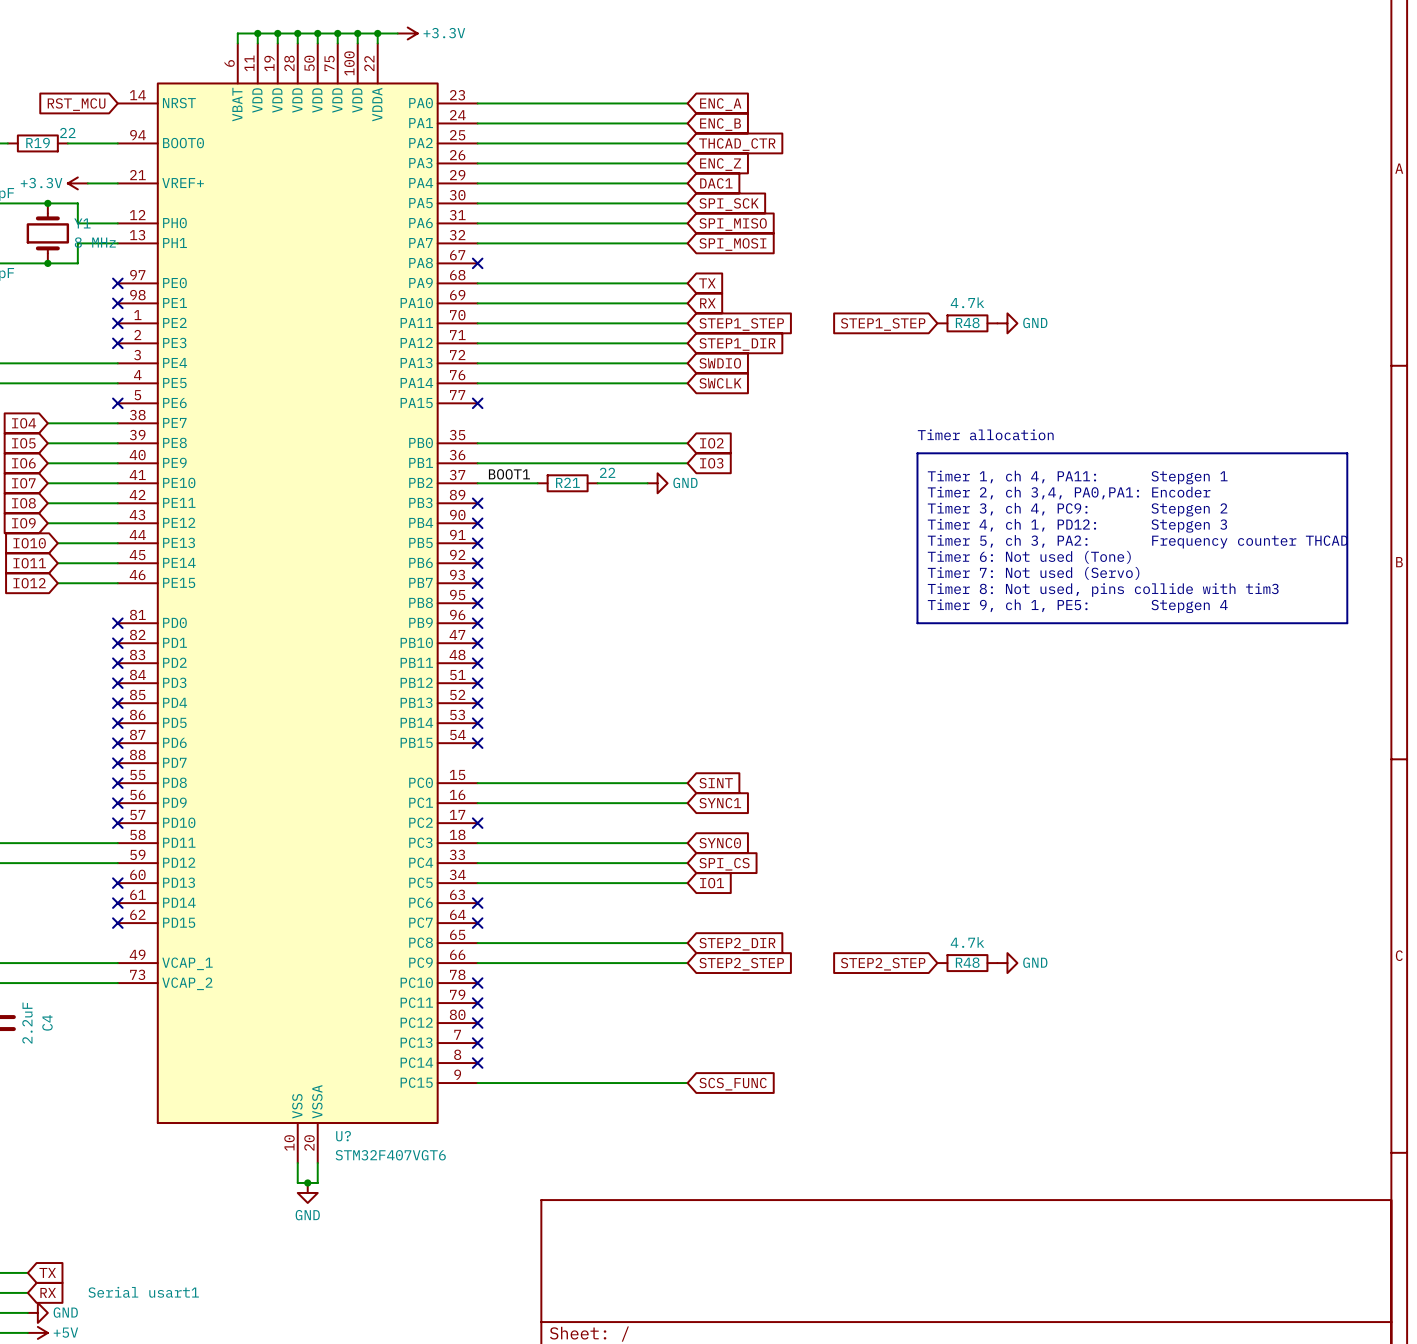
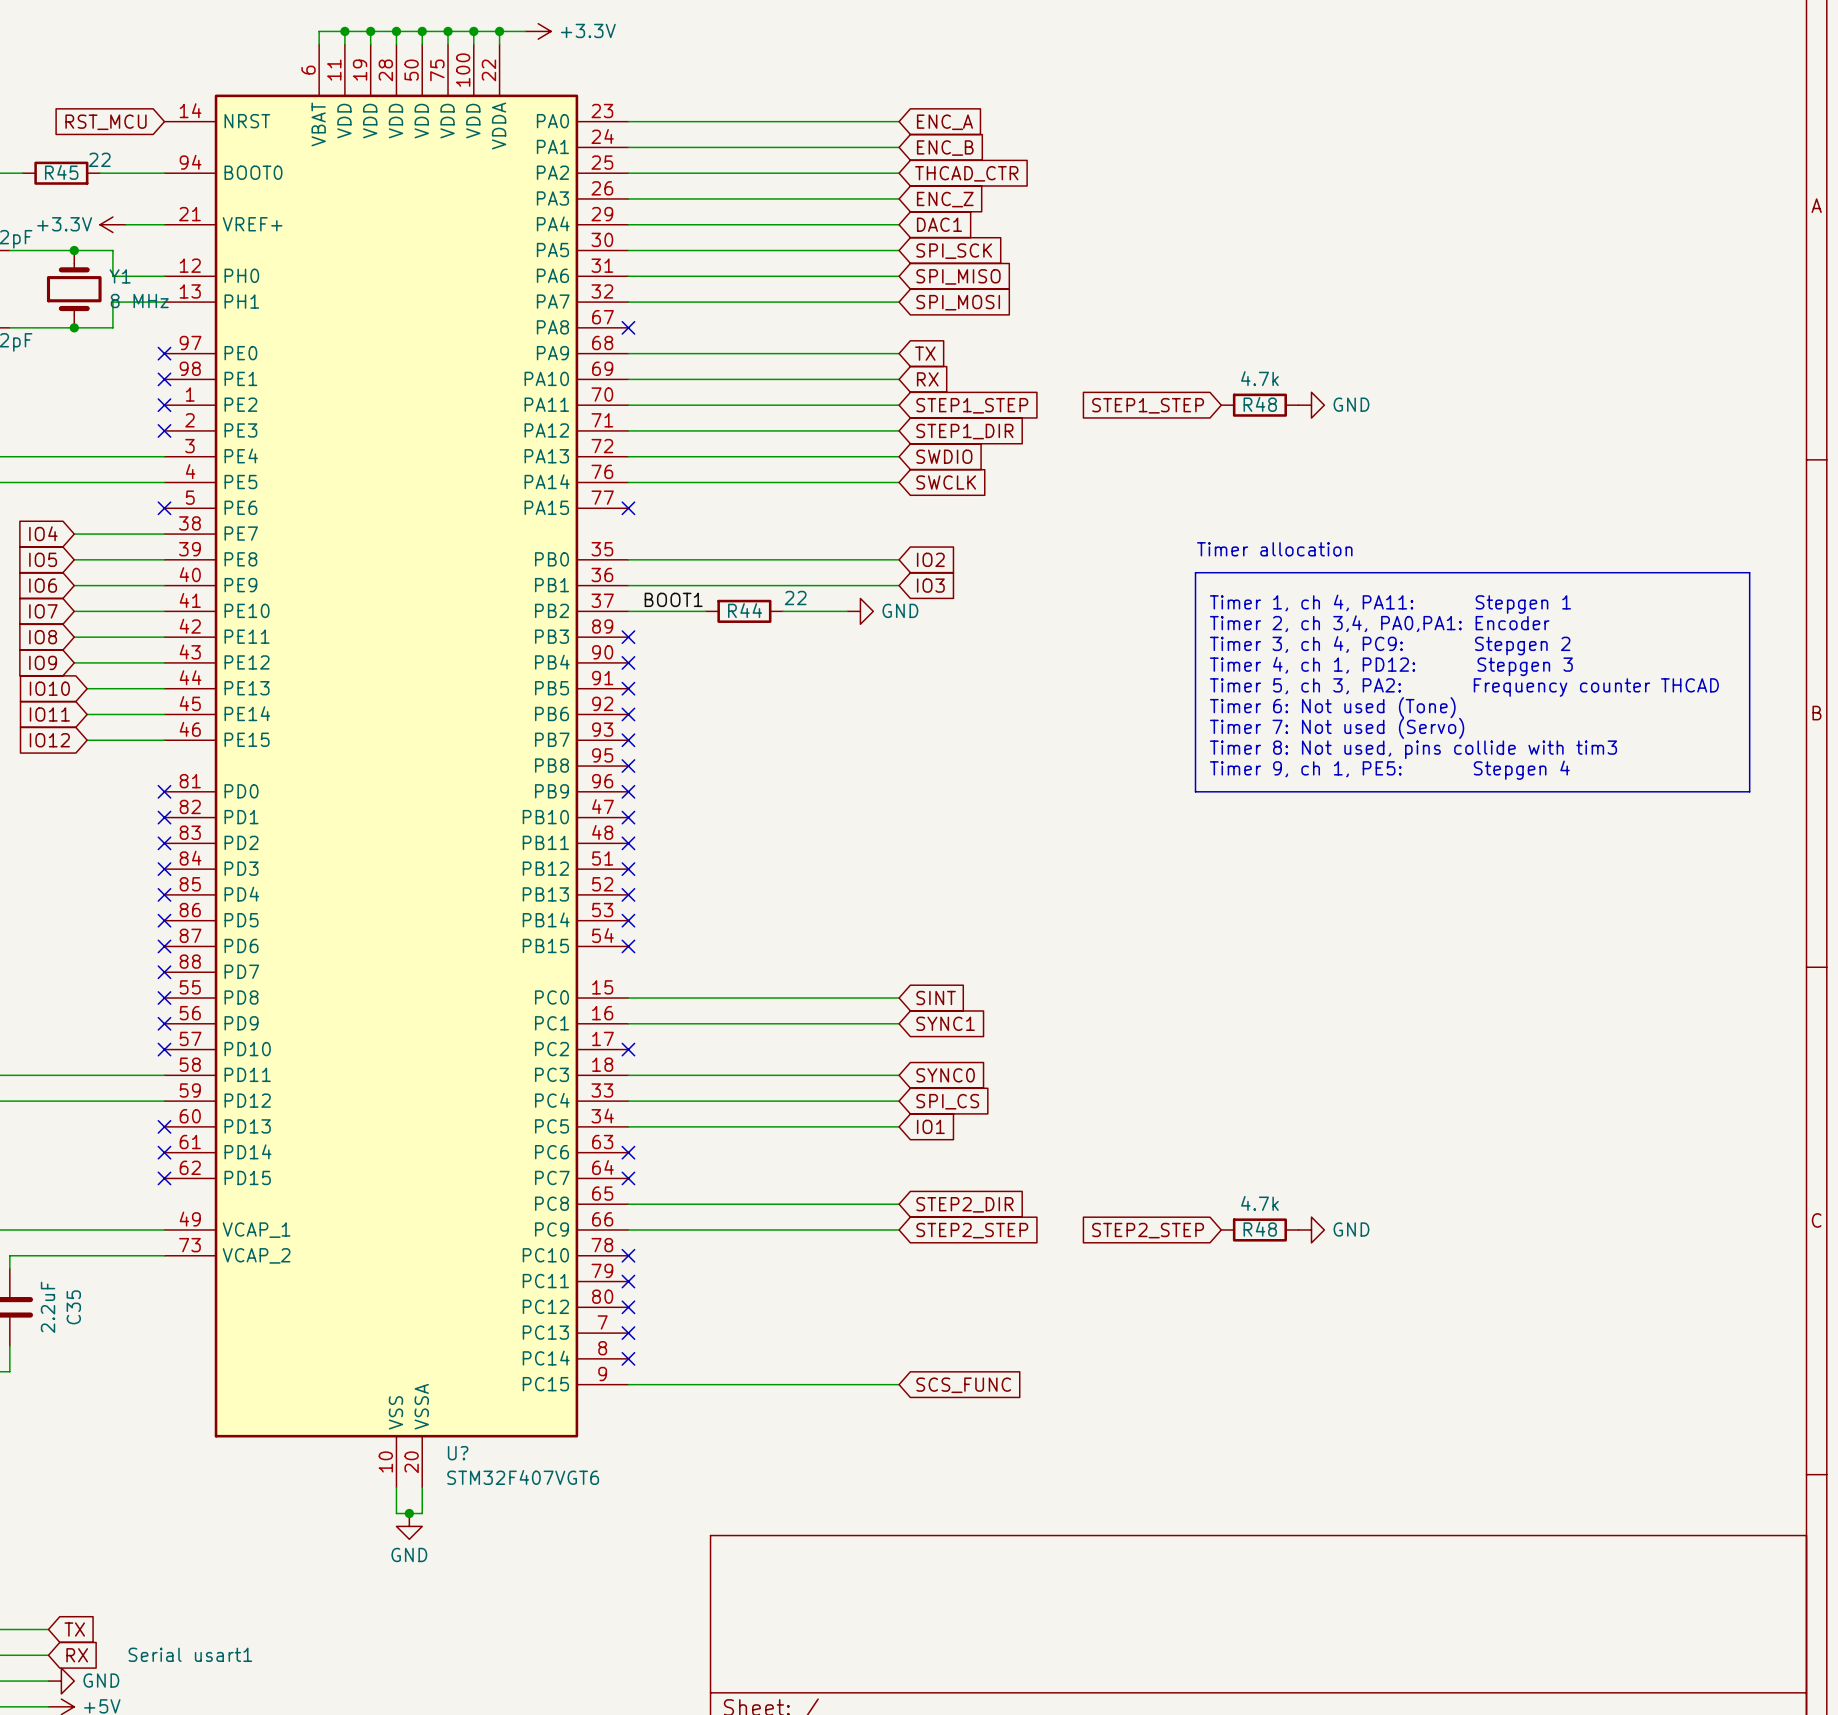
R19 name: R19 (38, 142) -> R45 (61, 172)
R21 name: R21 (567, 482) -> R44 (745, 610)
C4 name: C4 (47, 1022) -> C35 (73, 1307)

